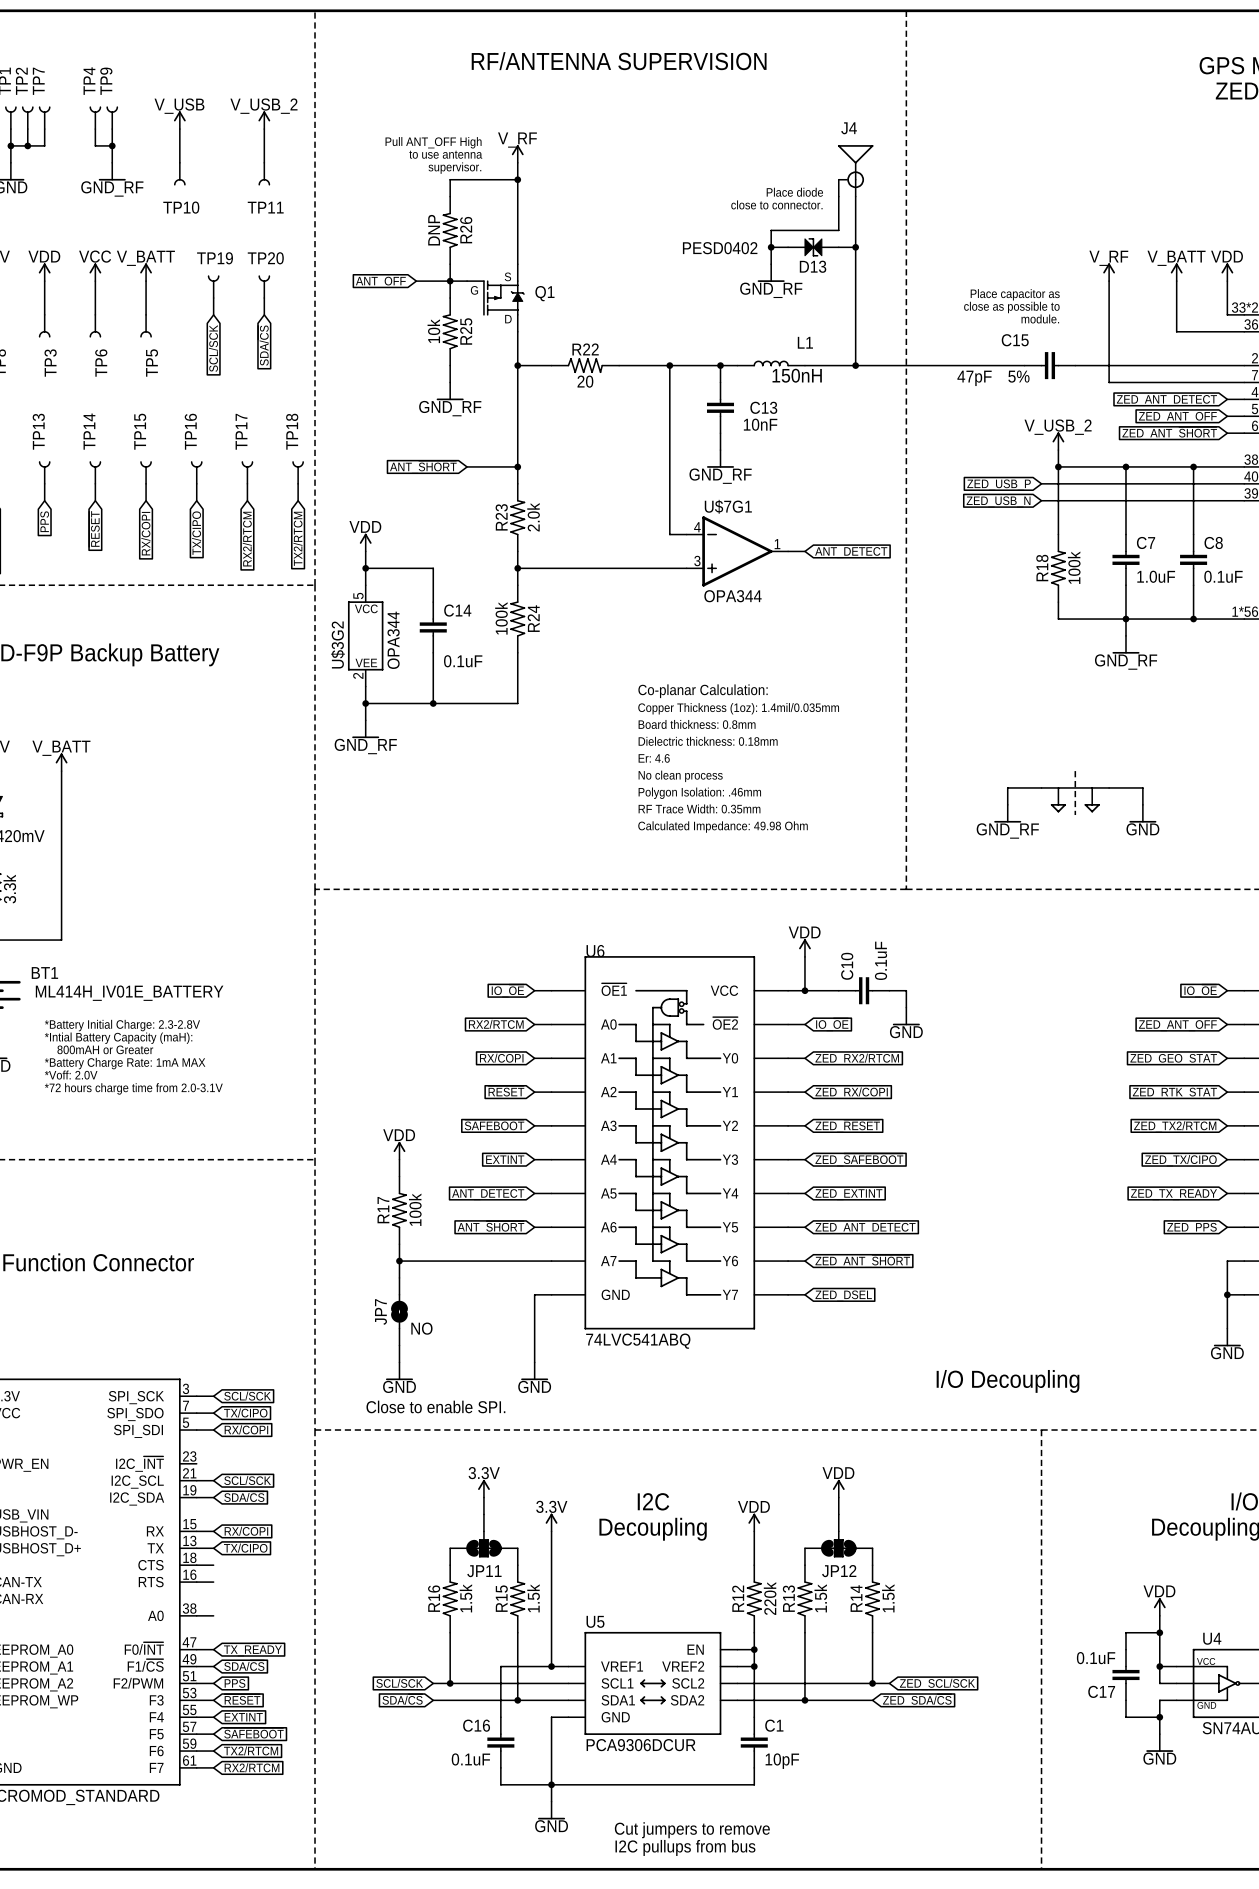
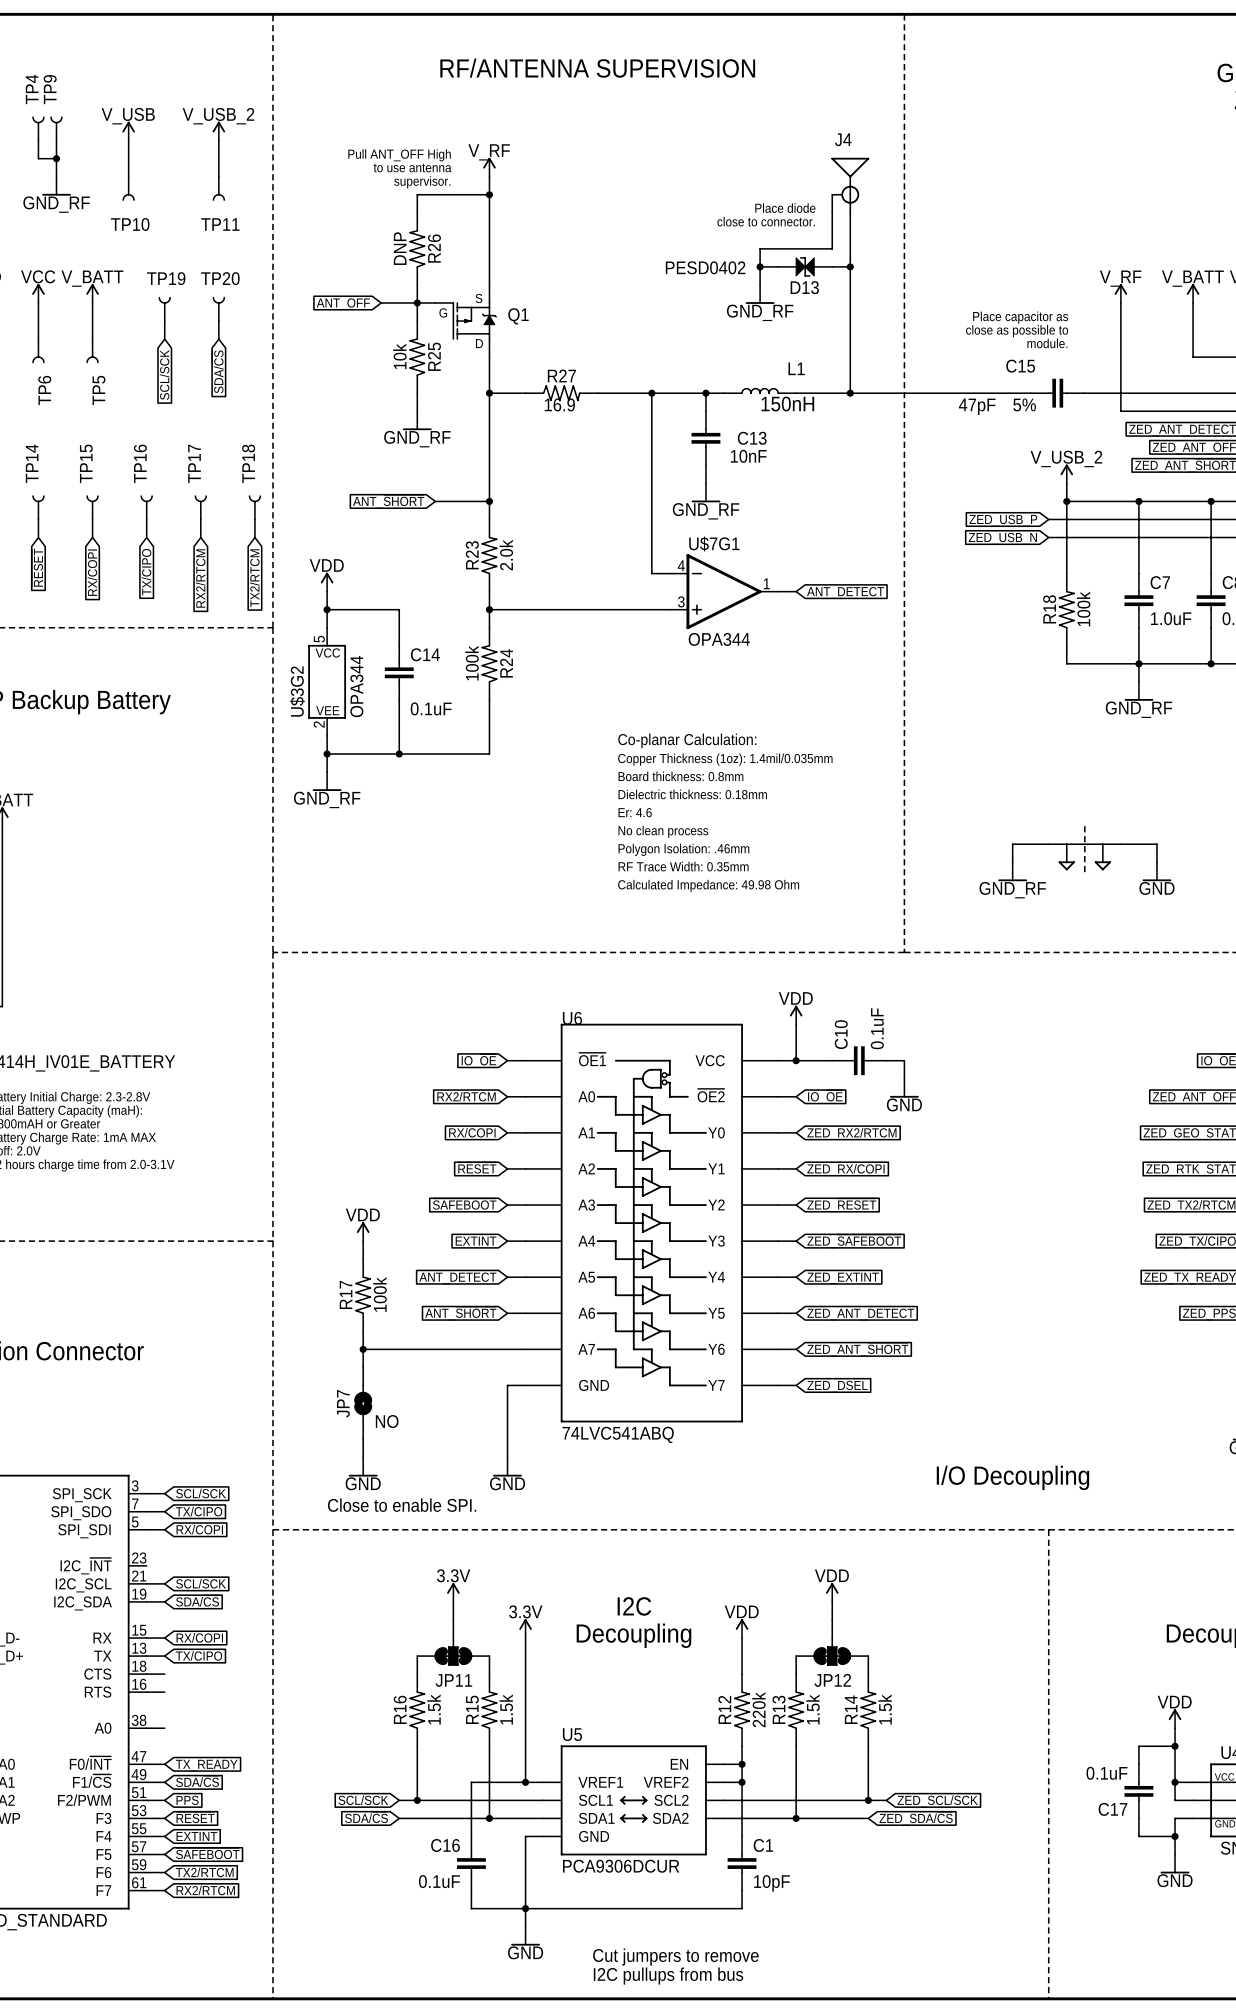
R22 name: R22 (585, 349) -> R27 (561, 375)
R22 text: none -> 16.9 (559, 404)
R22 value: 20 (585, 381) -> none

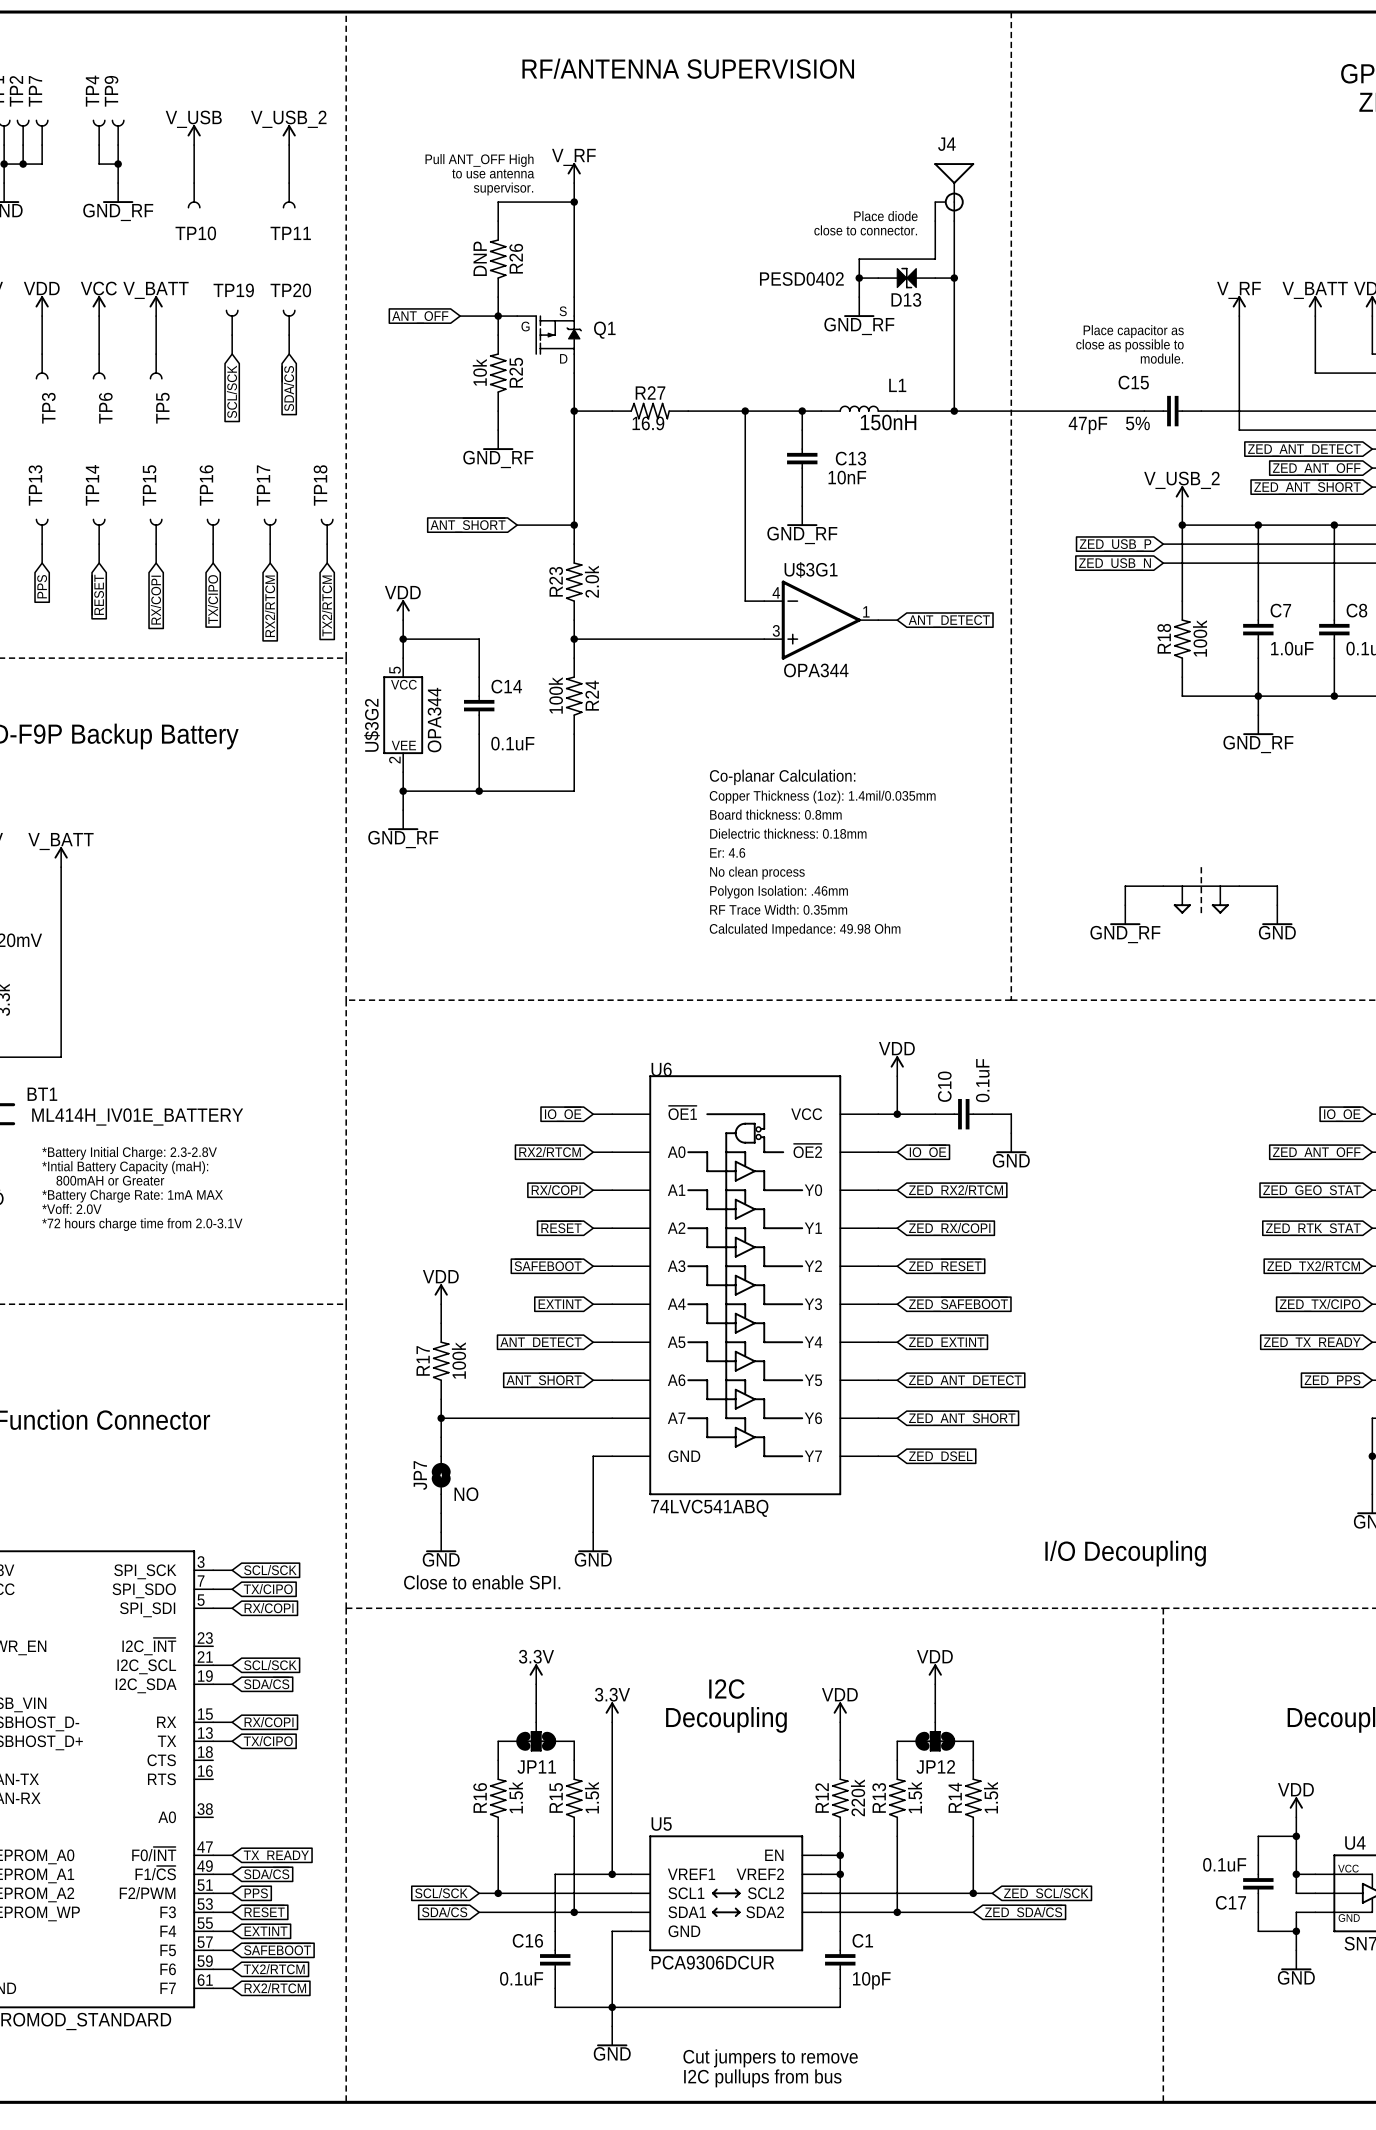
U$7G1 name: U$7G1 (714, 543) -> U$3G1 (811, 569)
wire: (146, 1674) (164, 1674) -> none
wire: (146, 1692) (164, 1692) -> none
wire: (146, 1728) (164, 1728) -> none

